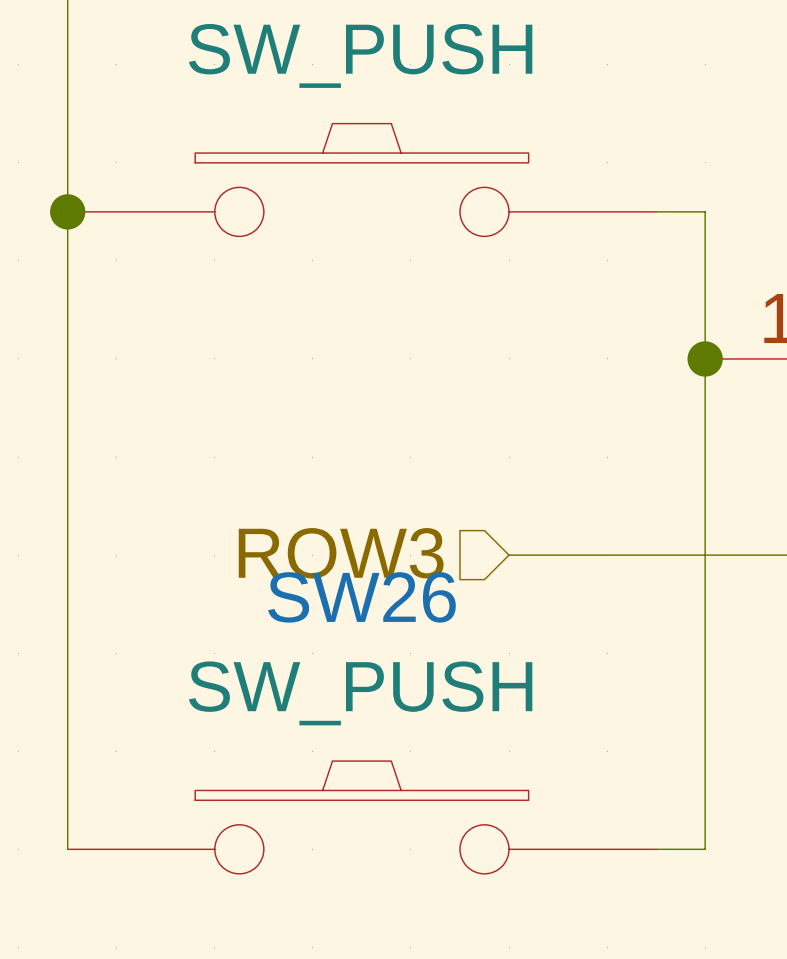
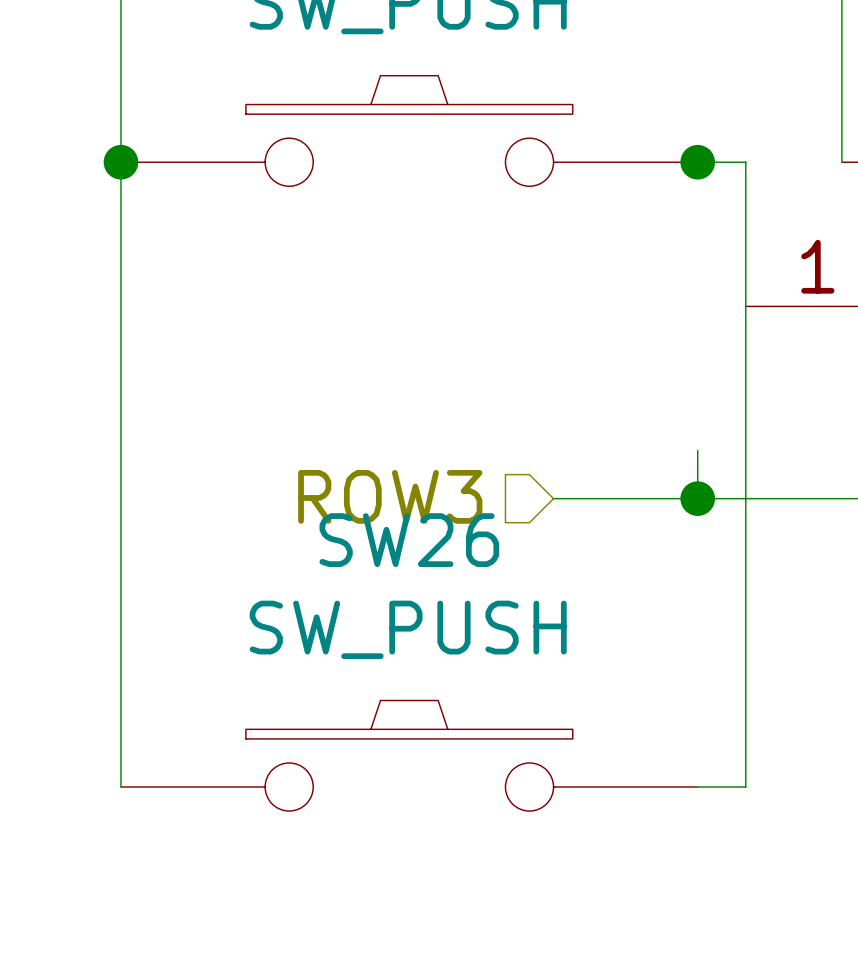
junction: none -> (697, 162)
junction: (705, 358) -> none
wire: none -> (697, 450) (697, 498)
junction: none -> (697, 498)

